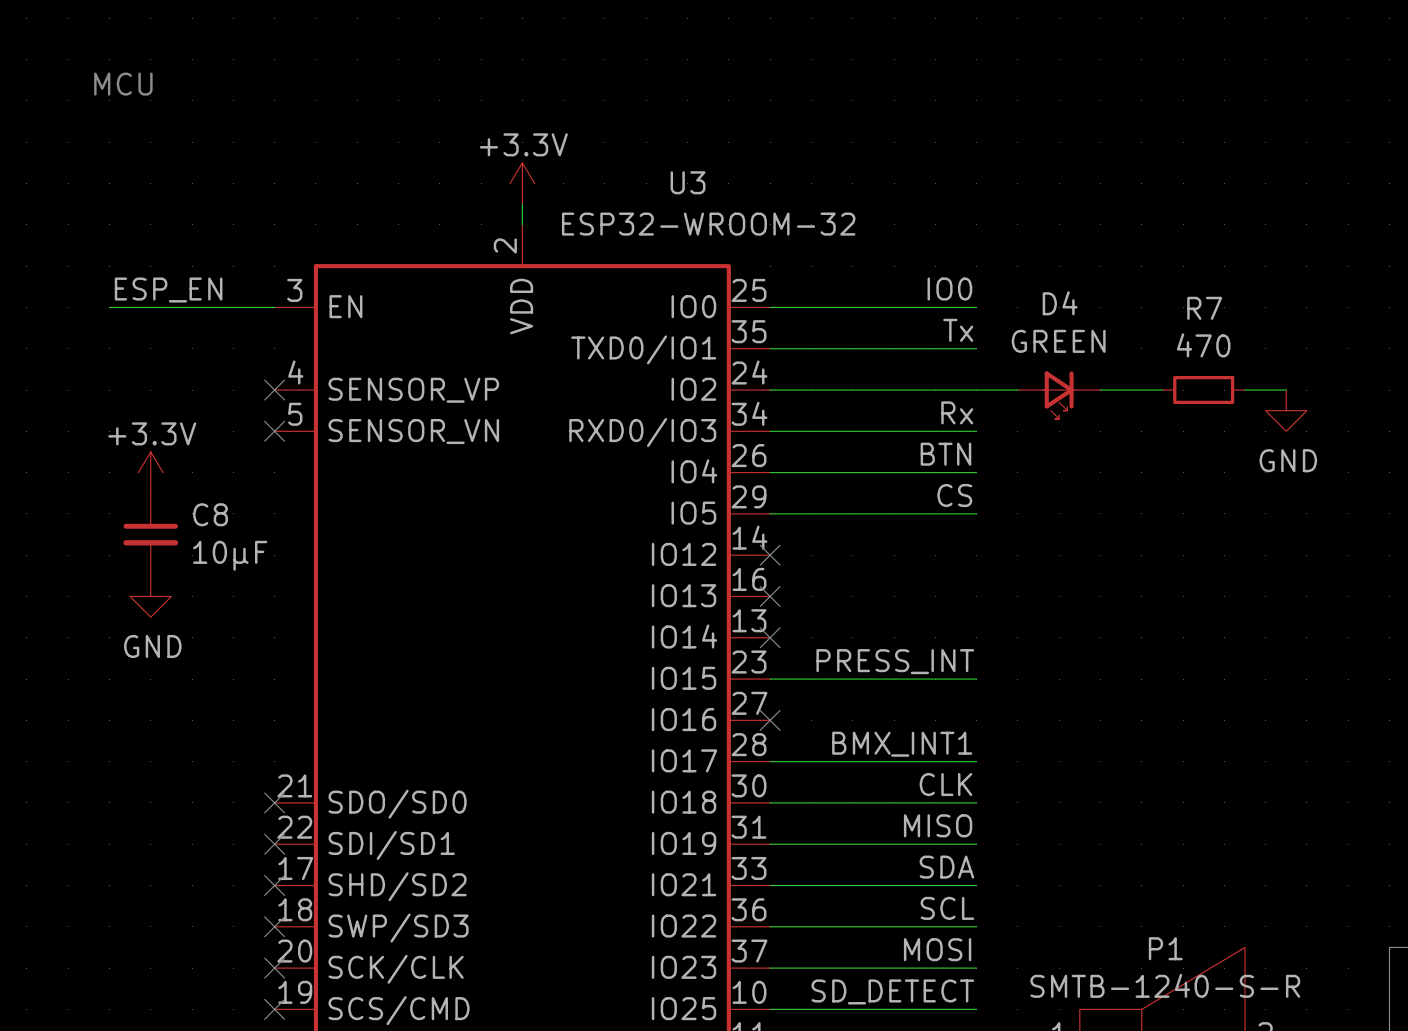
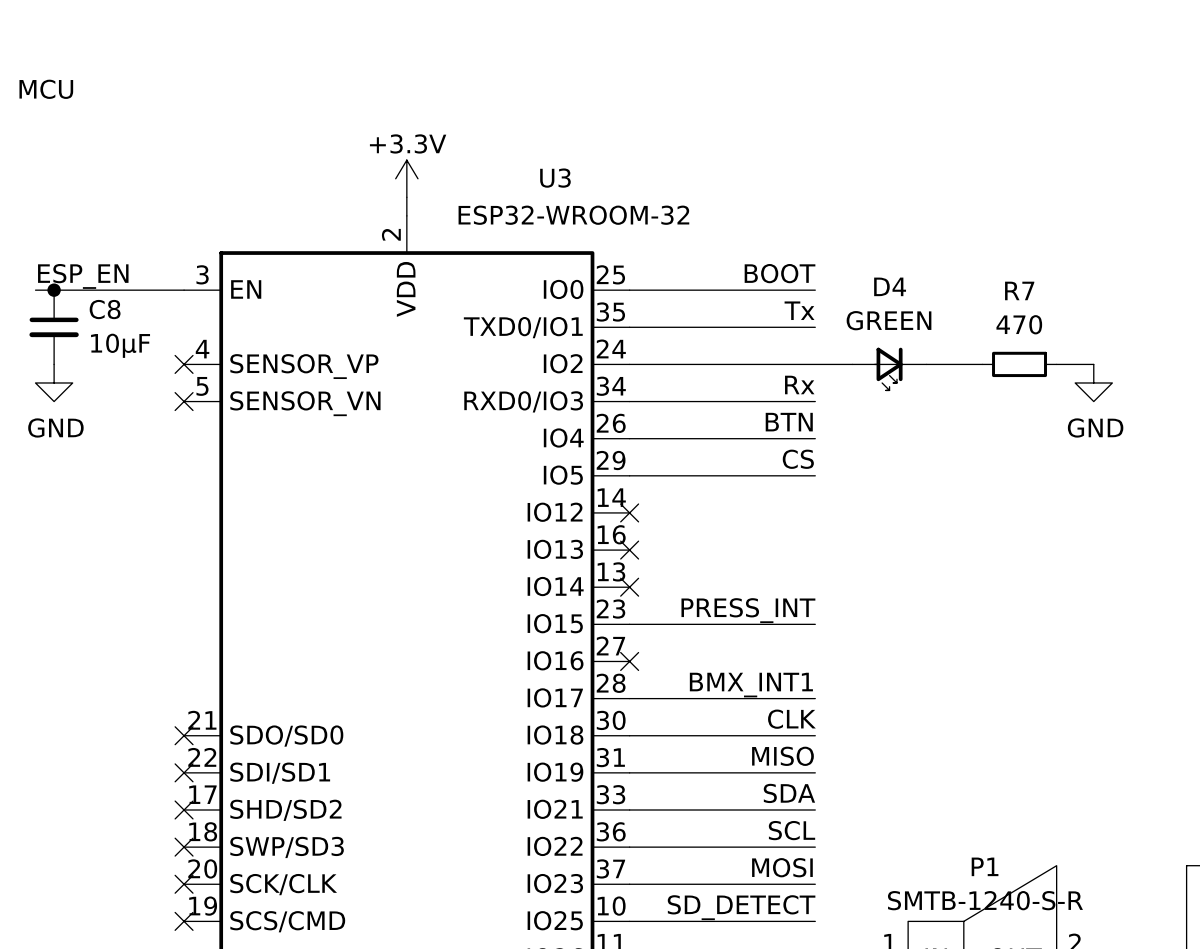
label: IO0 (949, 289) -> BOOT (780, 273)
junction: none -> (54, 290)
power symbol: +3.3V (150, 472) -> none
C8 position: (150, 534) -> (54, 327)
power symbol position: GND (150, 596) -> GND (54, 382)

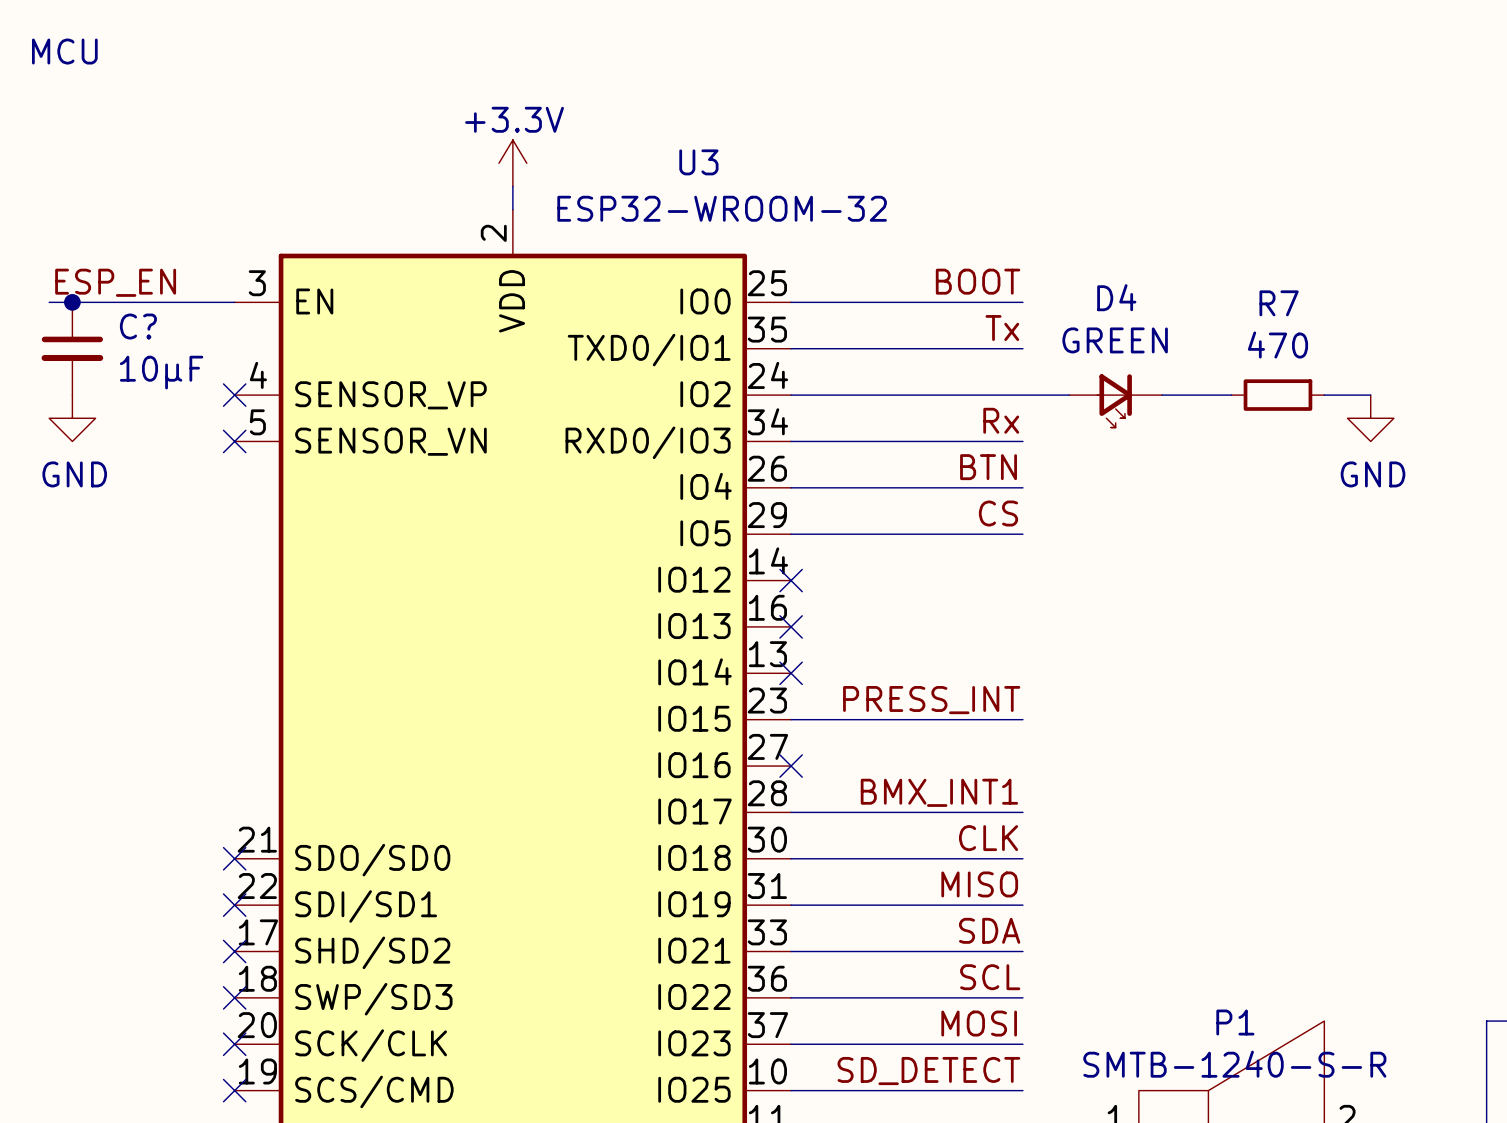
C8 name: C8 (105, 309) -> C? (138, 326)

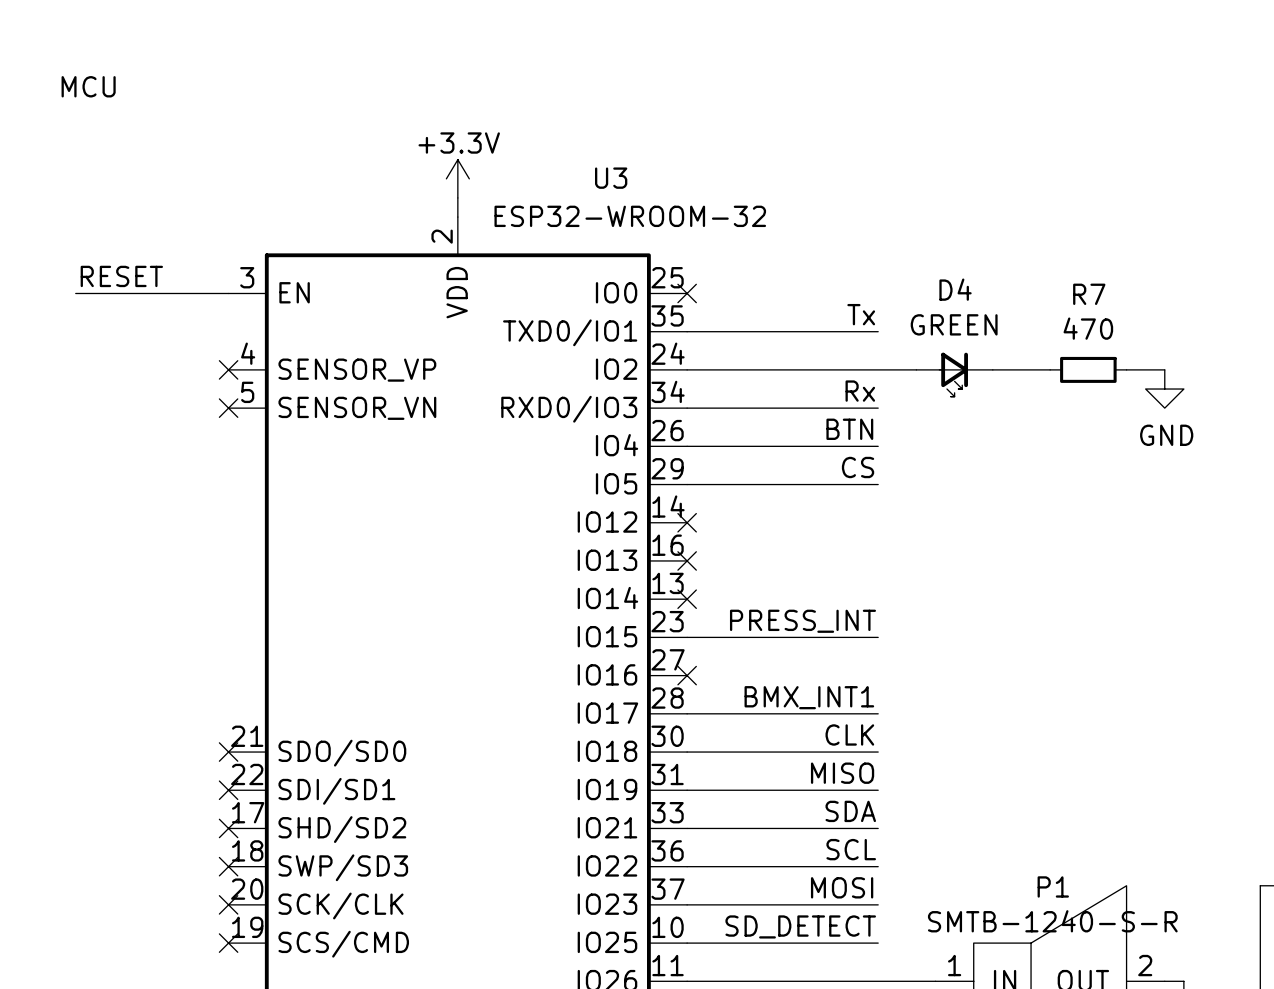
label: BOOT (978, 281) -> none
label: ESP_EN (115, 282) -> RESET (121, 276)
junction: (72, 302) -> none
wire: (791, 302) (1022, 302) -> none
no-connect mark: none -> (687, 293)
C?: 10µF (72, 348) -> none
power symbol: GND (72, 418) -> none

